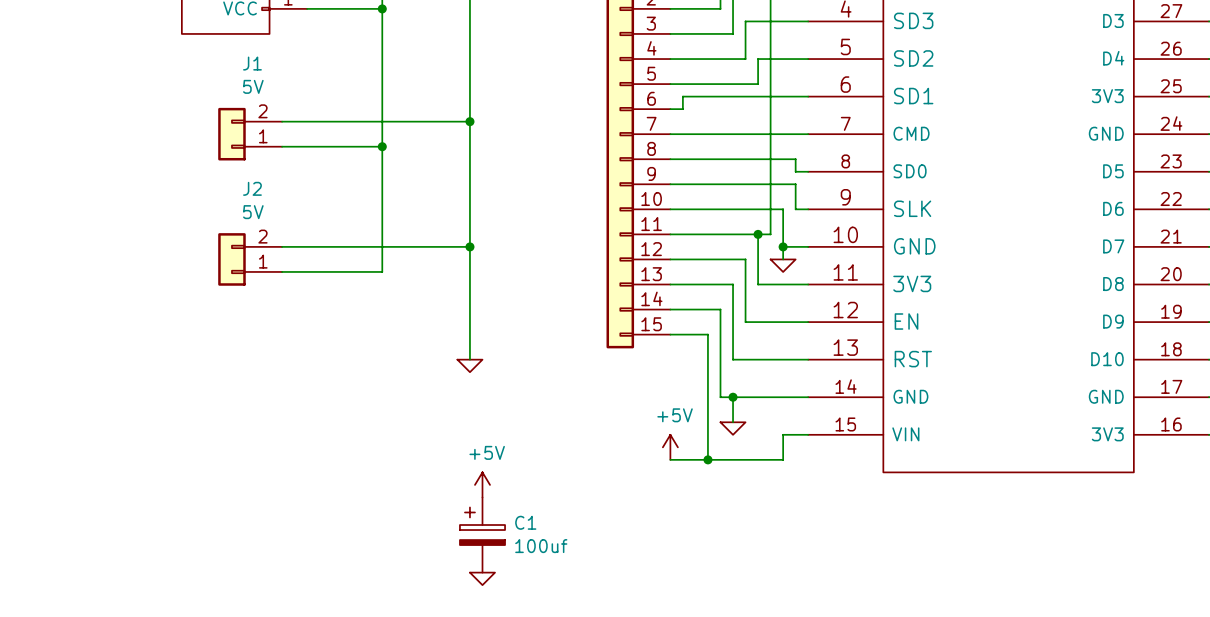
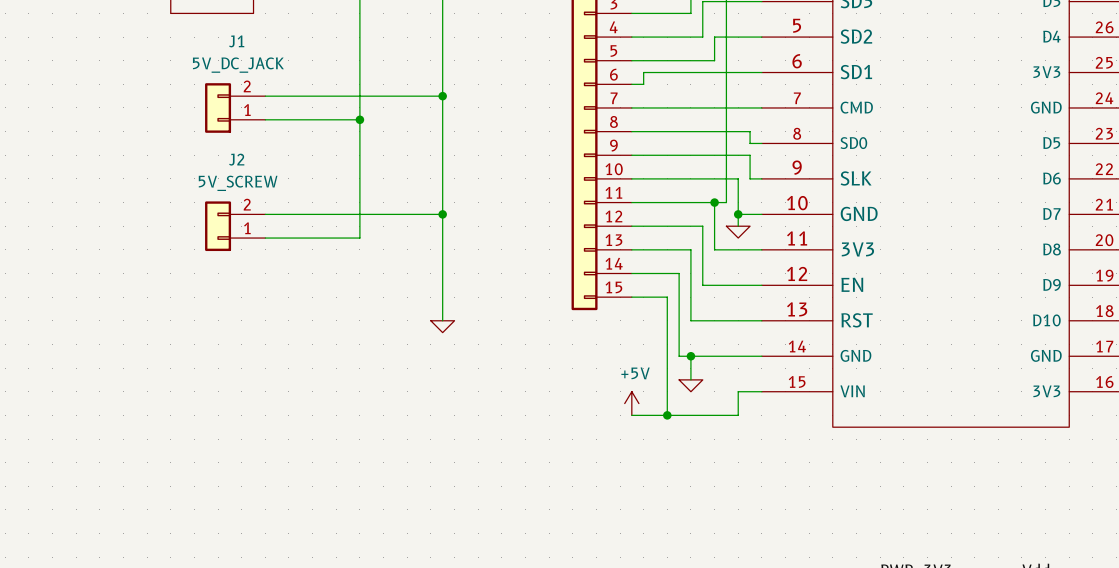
J1 value: 5V (253, 86) -> 5V_DC_JACK (238, 65)
J2 value: 5V (253, 212) -> 5V_SCREW (238, 183)
power symbol: +5V (482, 484) -> none
C1: 100uf (482, 535) -> none
power symbol: (482, 578) -> none

